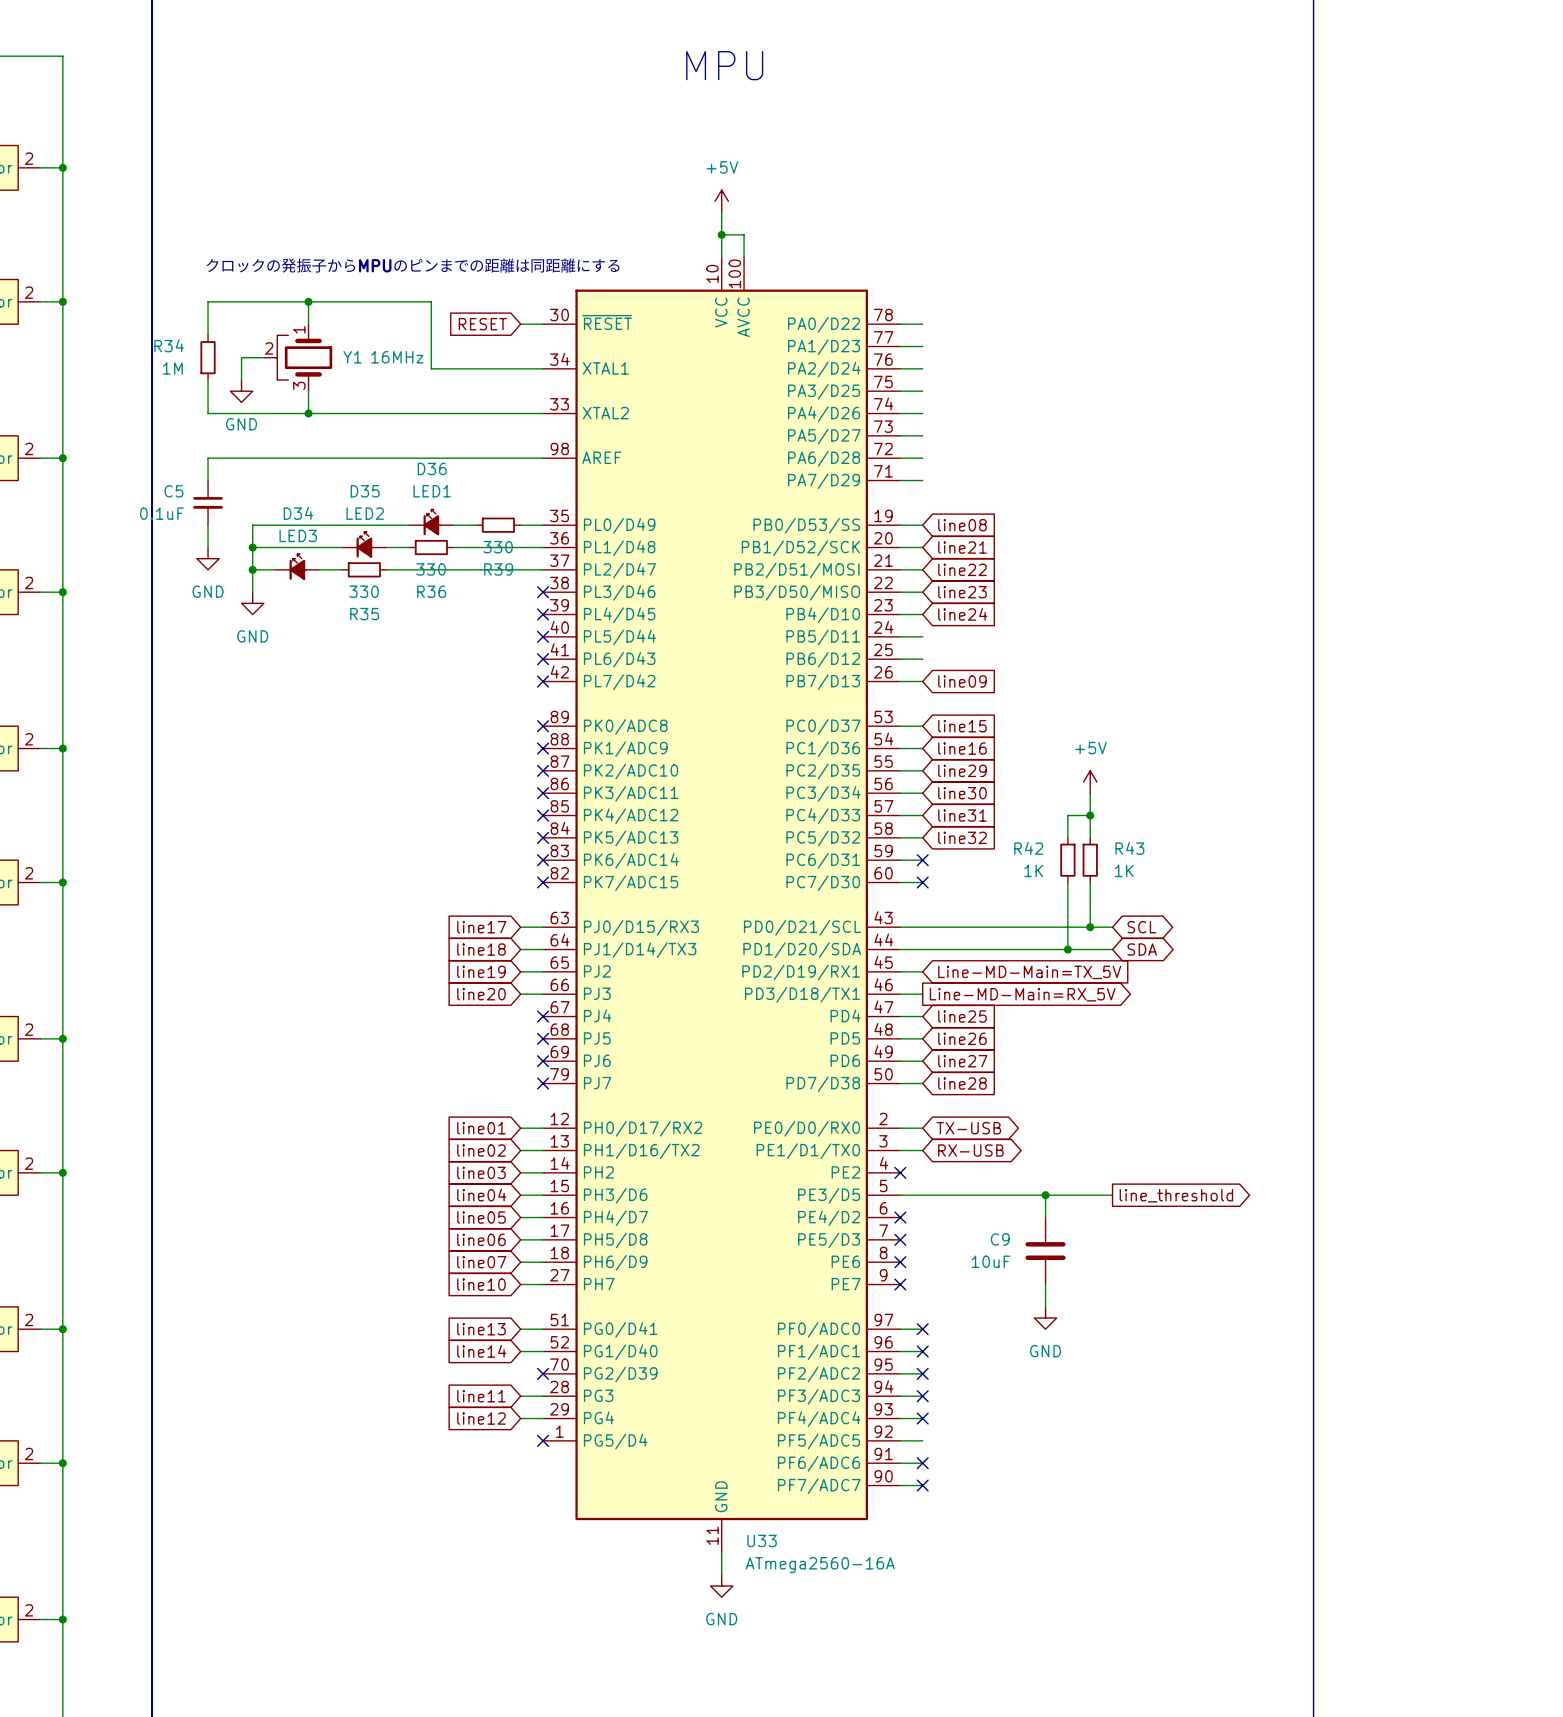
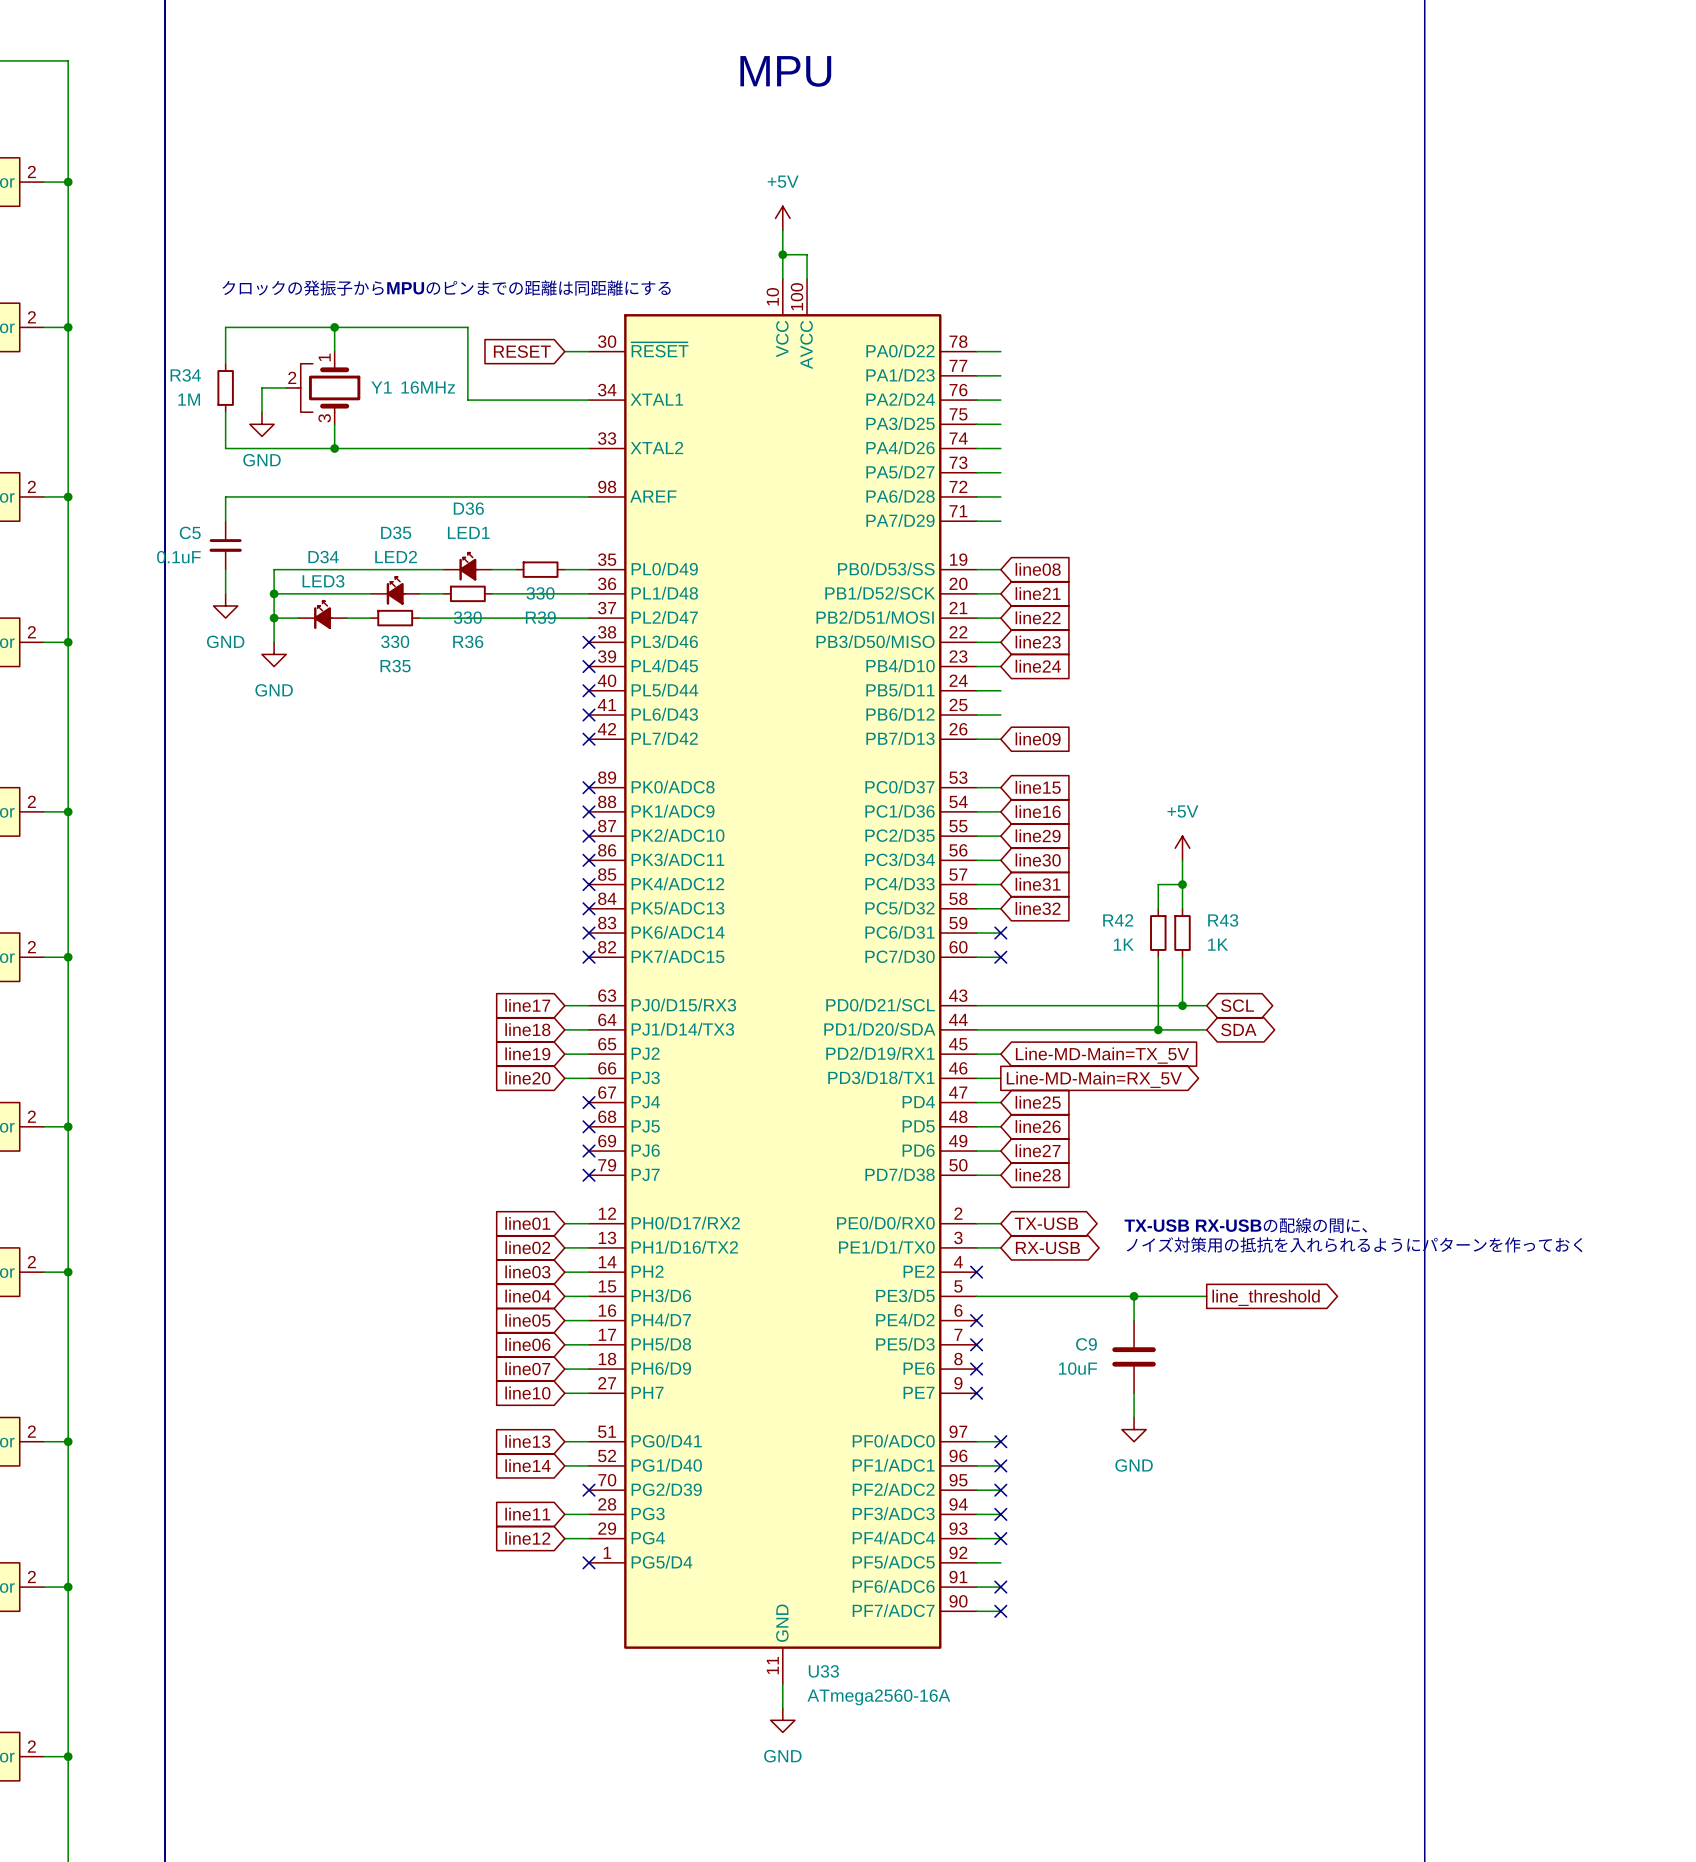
text: none -> TX-USB RX-USBの配線の間に、 (1245, 1225)
text: none -> ノイズ対策用の抵抗を入れられるようにパターンを作っておく (1354, 1244)

